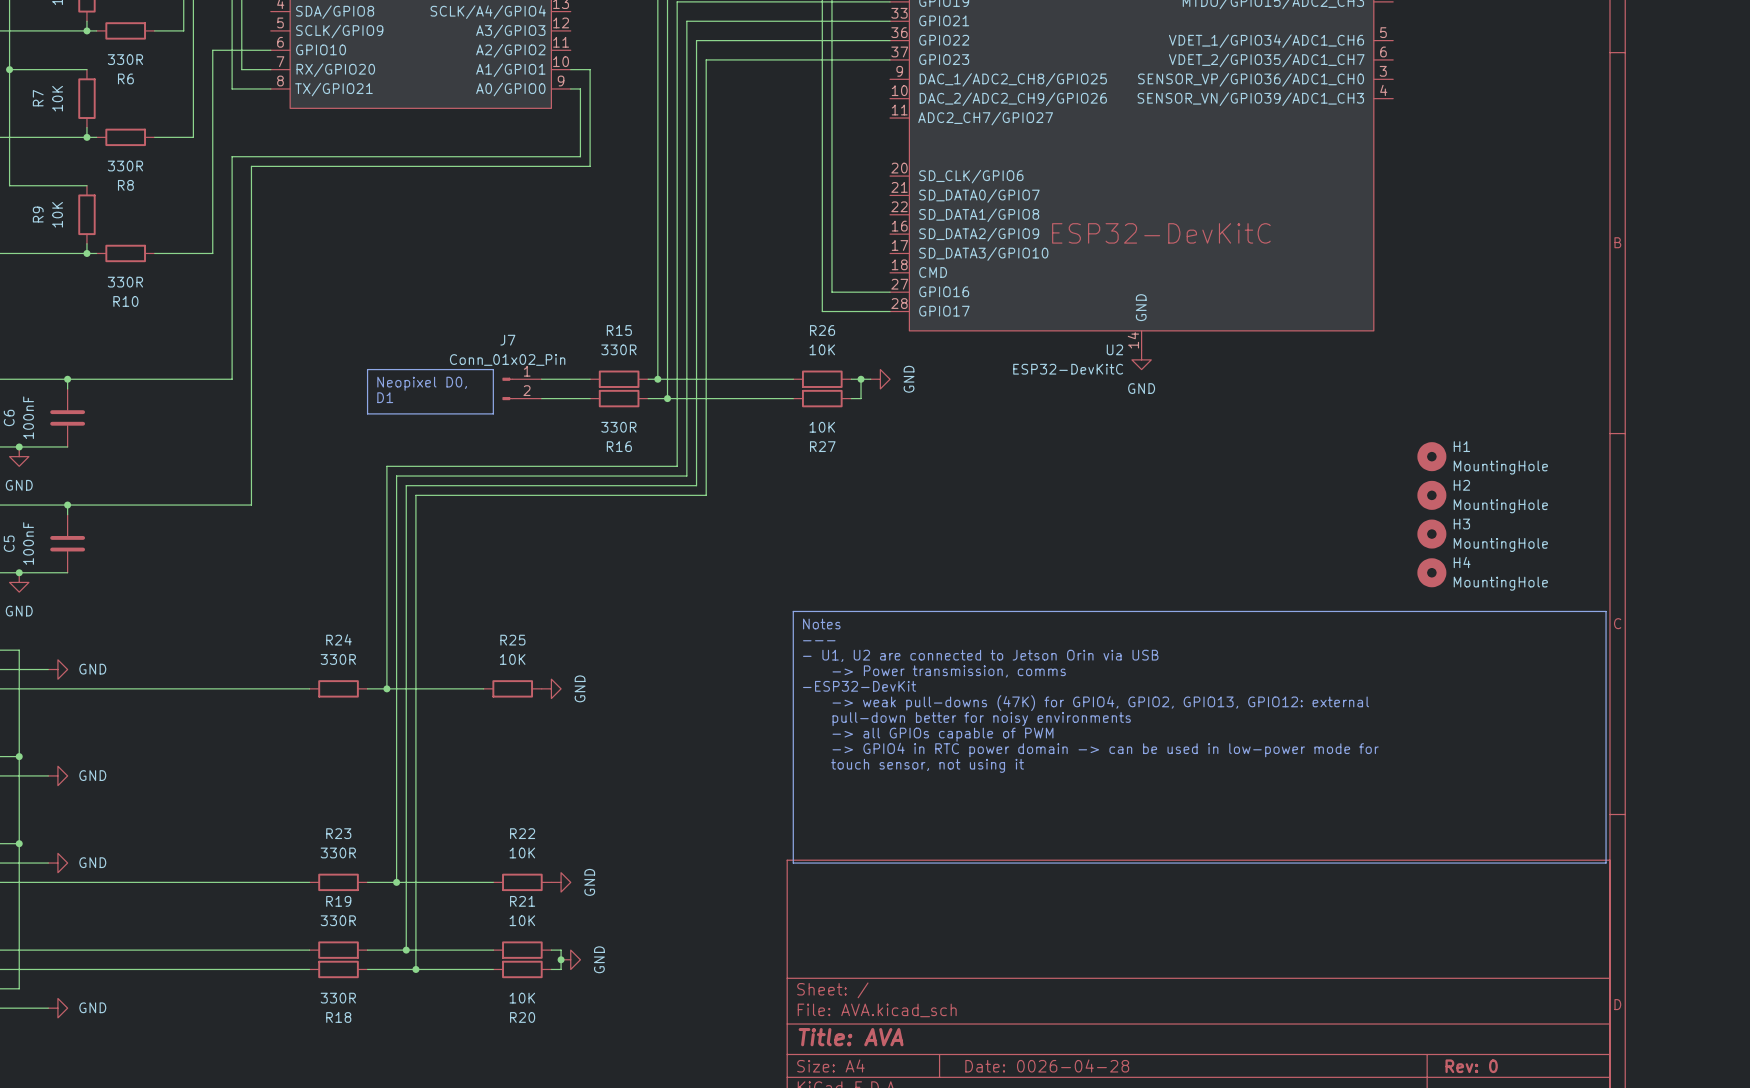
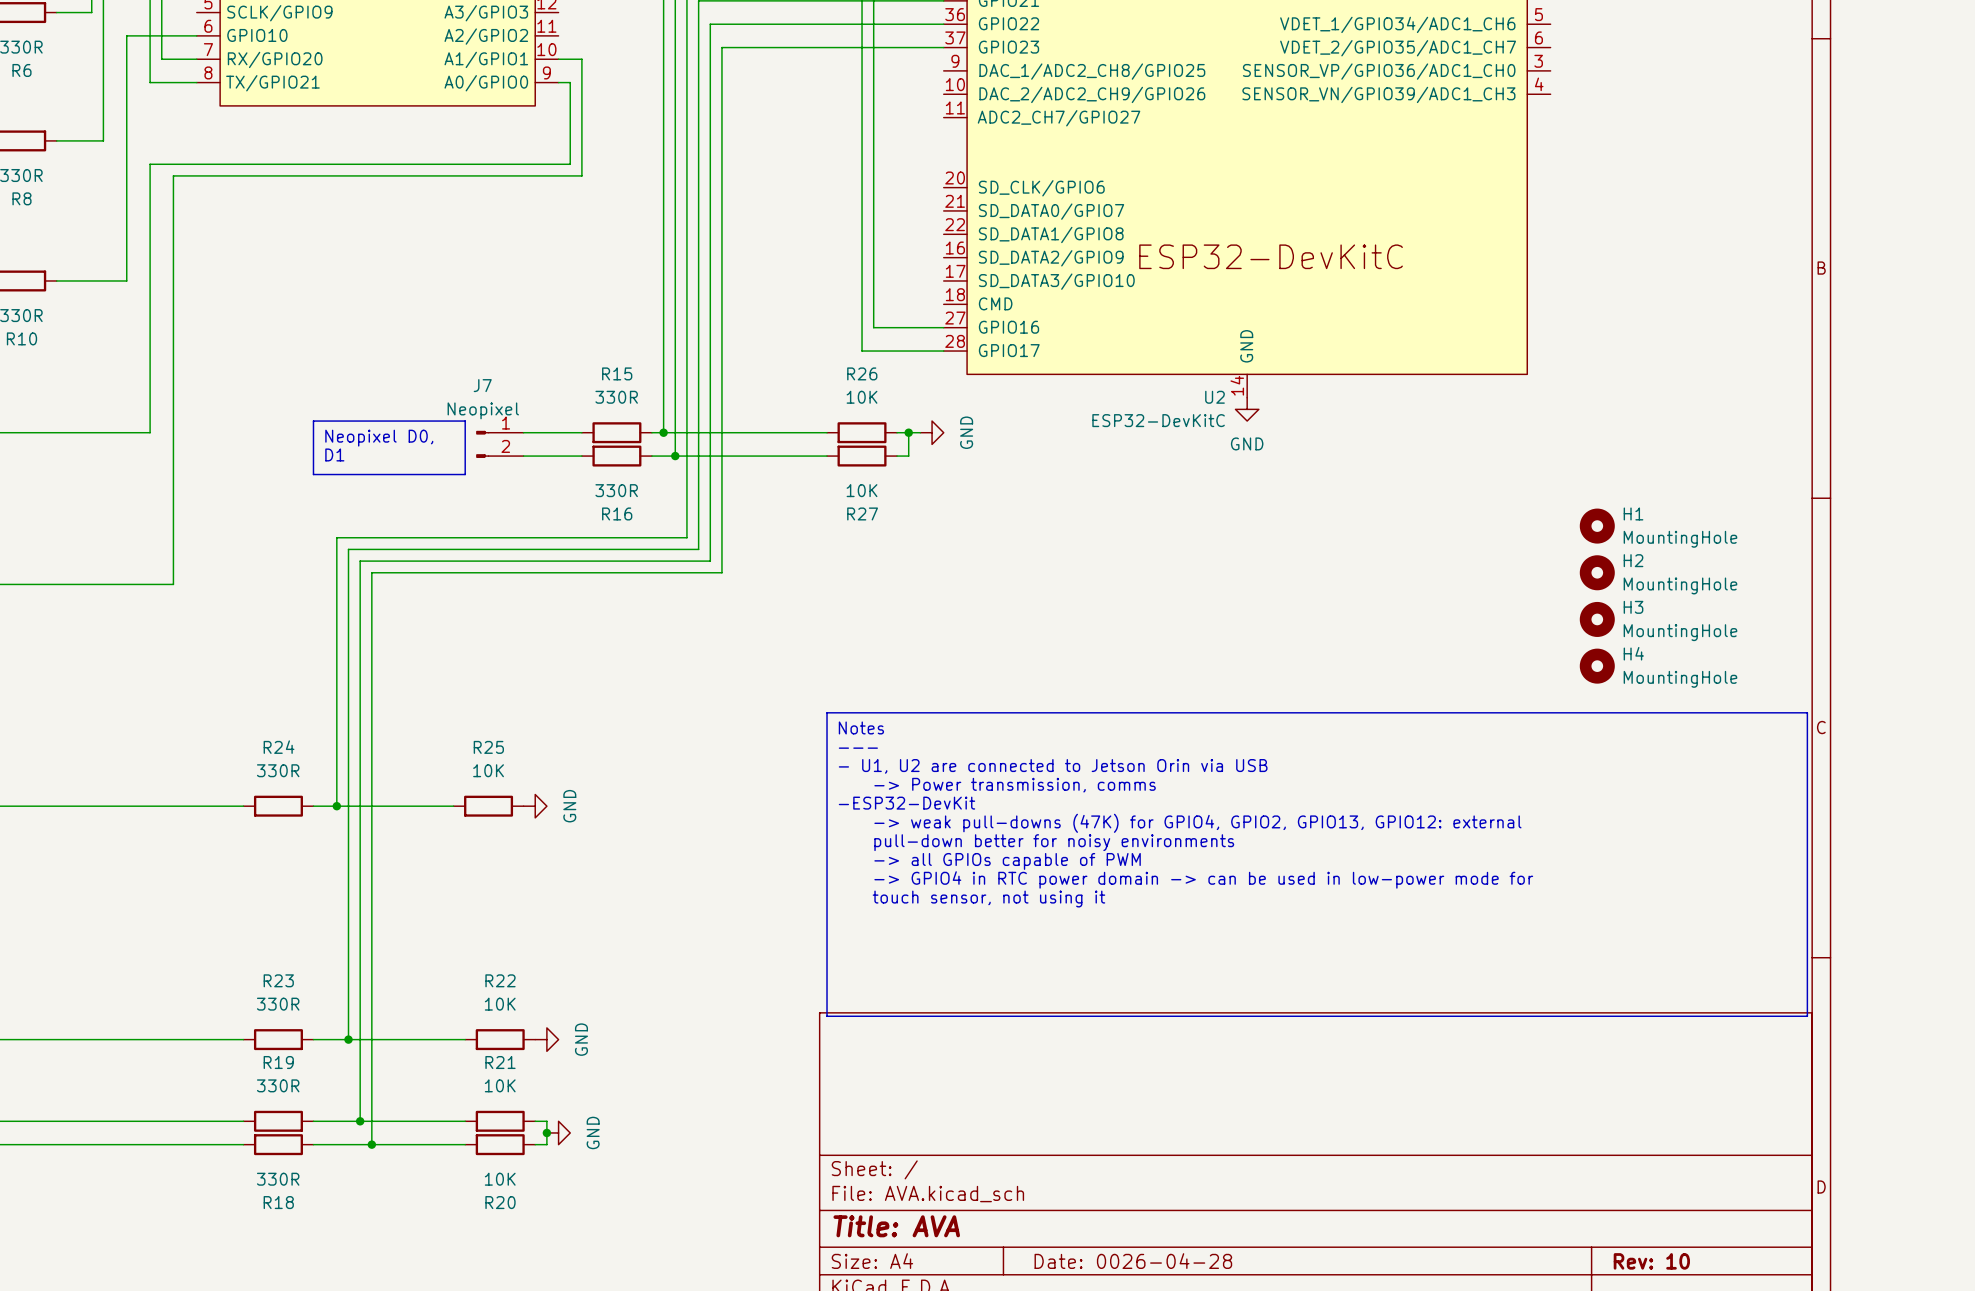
J7 value: Conn_01x02_Pin (507, 359) -> Neopixel (483, 410)
title block: Rev: 0 (1471, 1066) -> Rev: 10 (1651, 1261)

